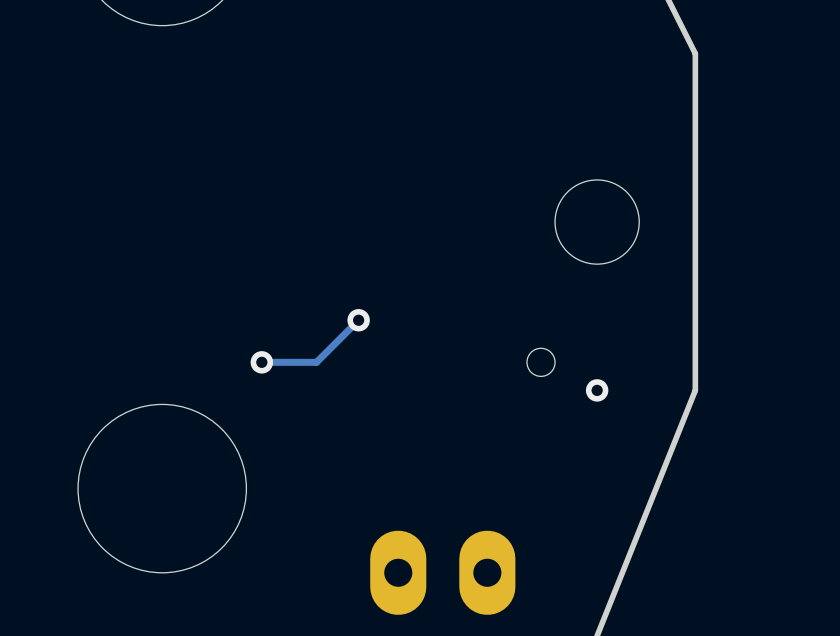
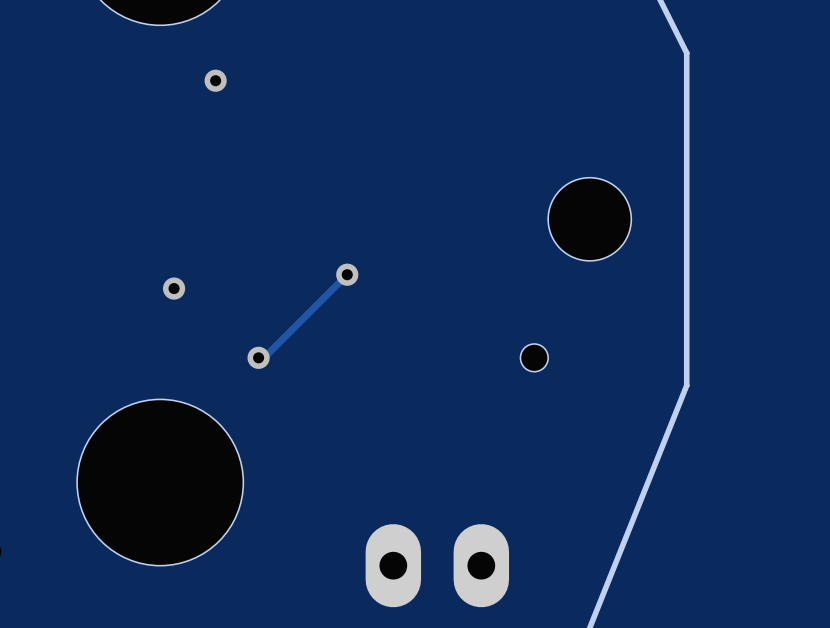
via: none -> (215, 80)
via: none -> (174, 288)
track: (358, 320) (316, 362) (267, 362) -> (347, 274) (264, 357)
via position: (358, 320) -> (347, 274)
via: (597, 390) -> none

